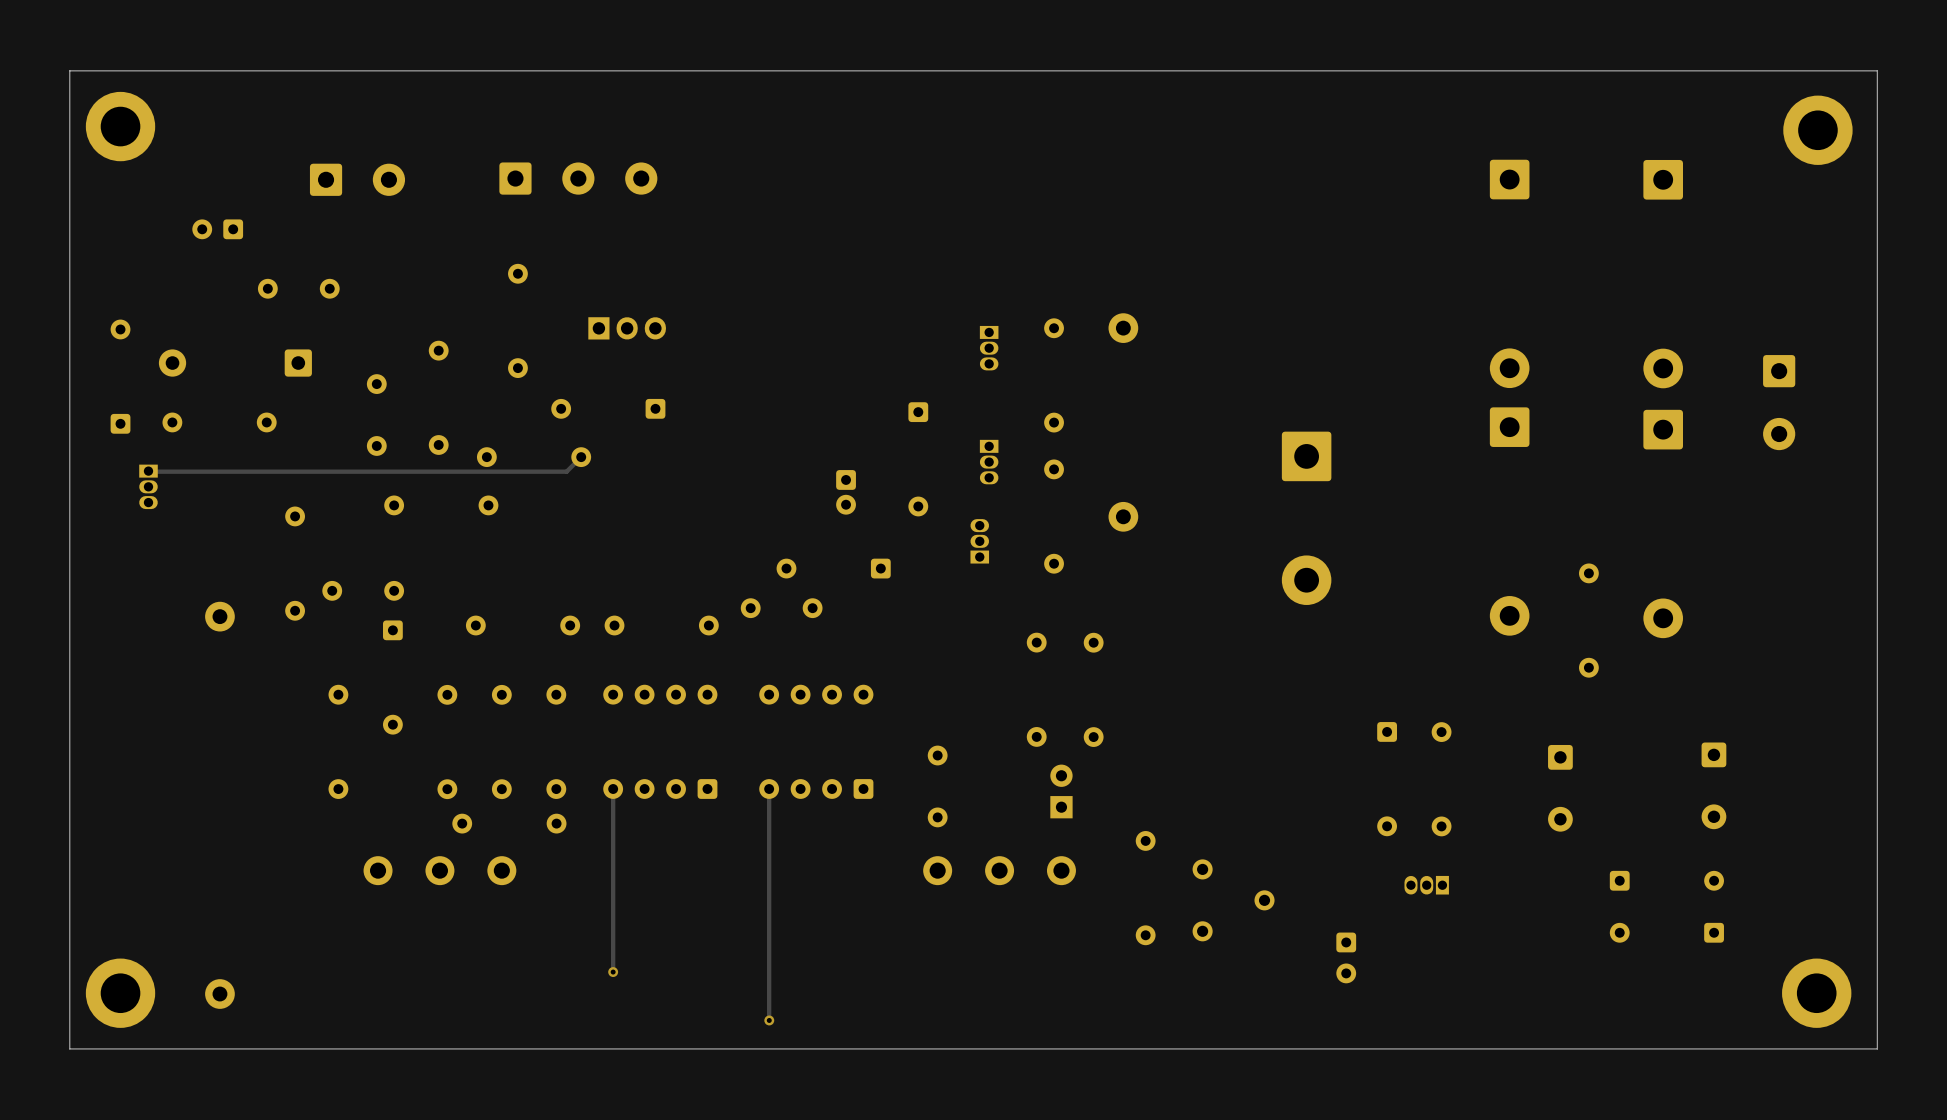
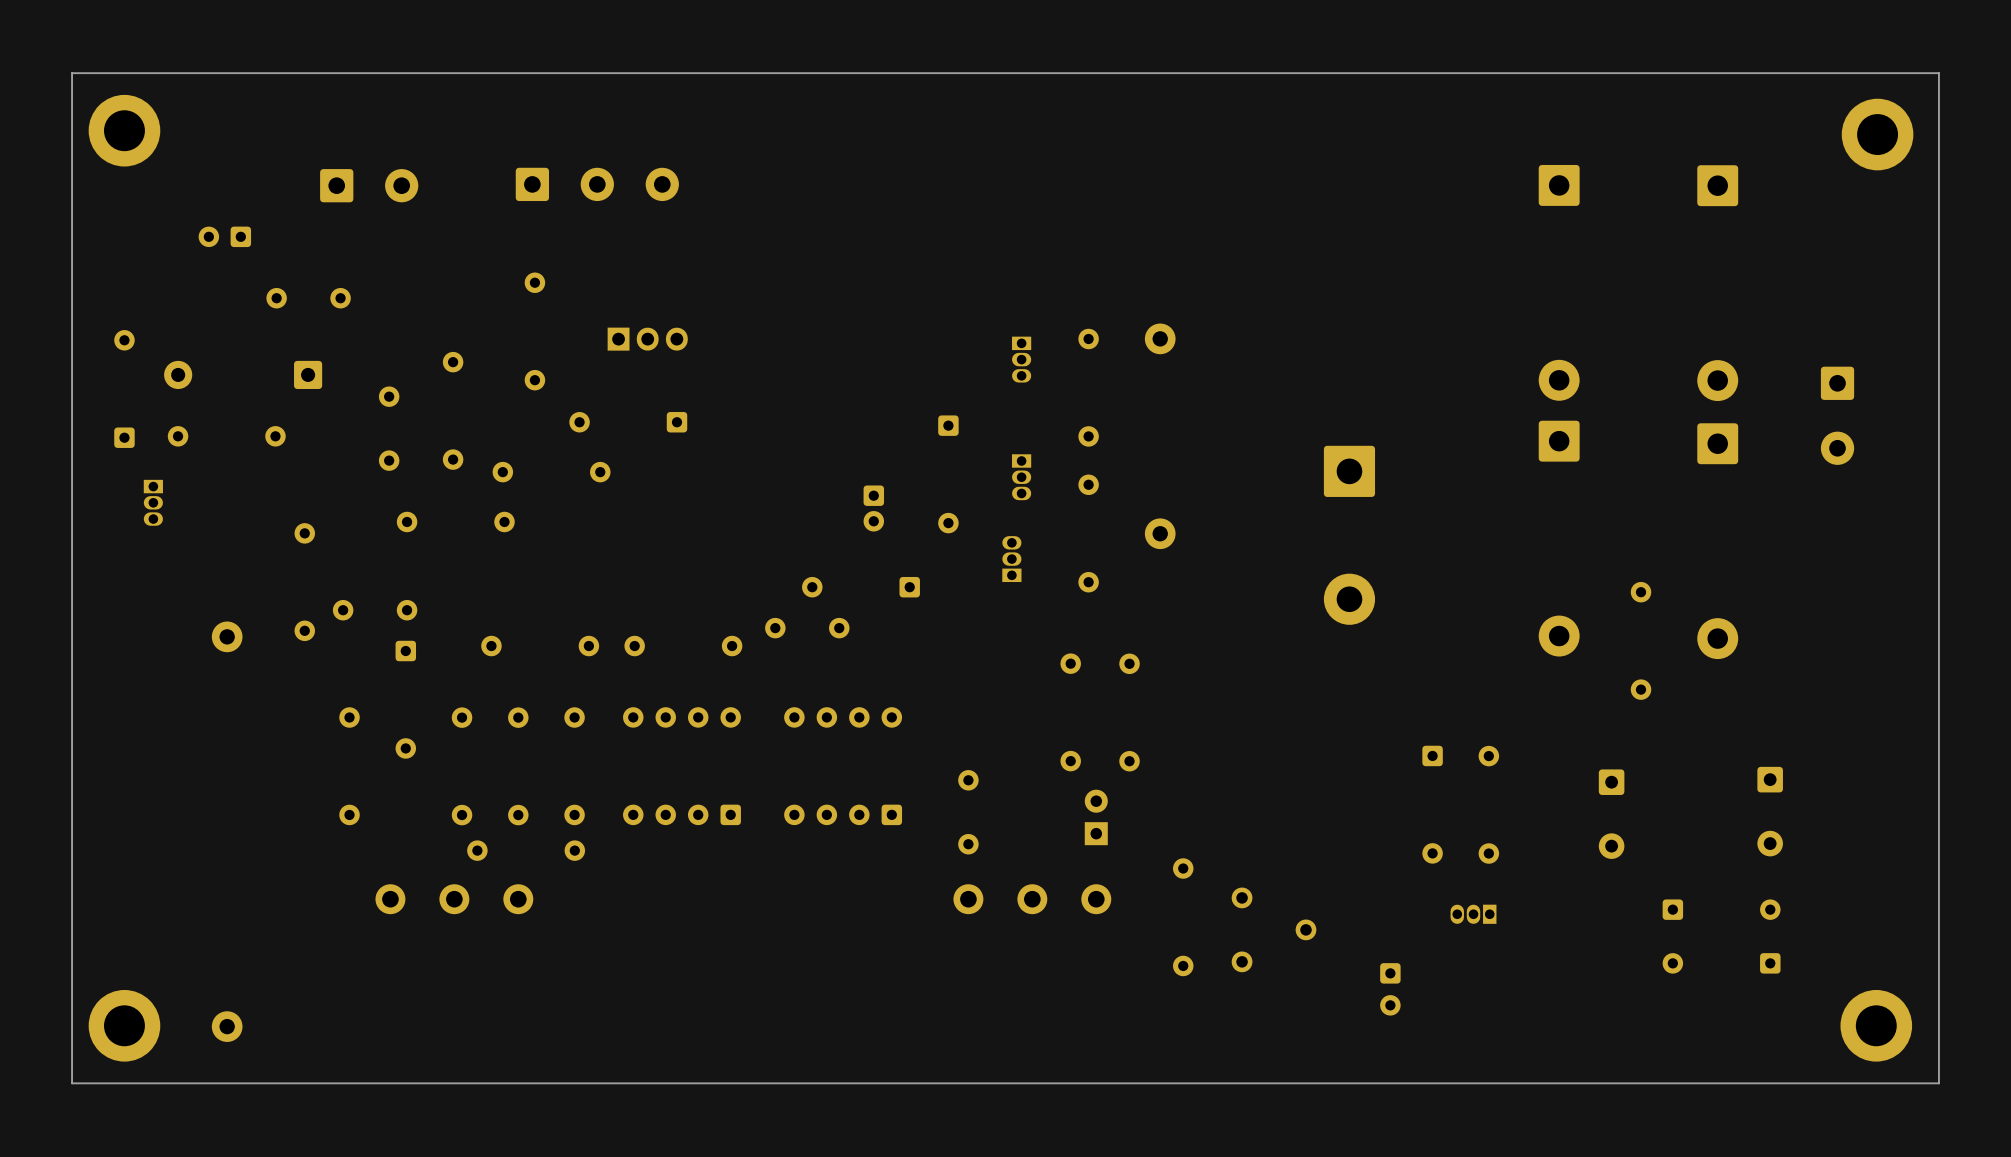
track: (581, 457) (566, 471) (148, 471) -> none
track: (613, 788) (613, 972) -> none
track: (769, 788) (769, 1020) -> none
via: (613, 972) -> none
via: (769, 1020) -> none

